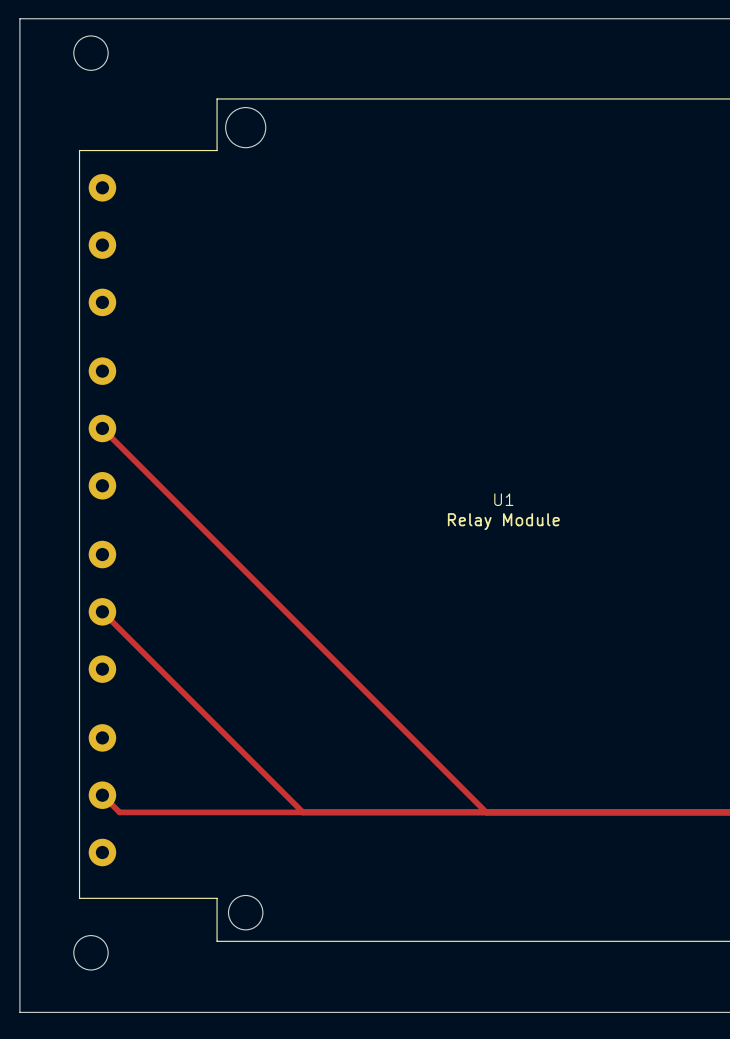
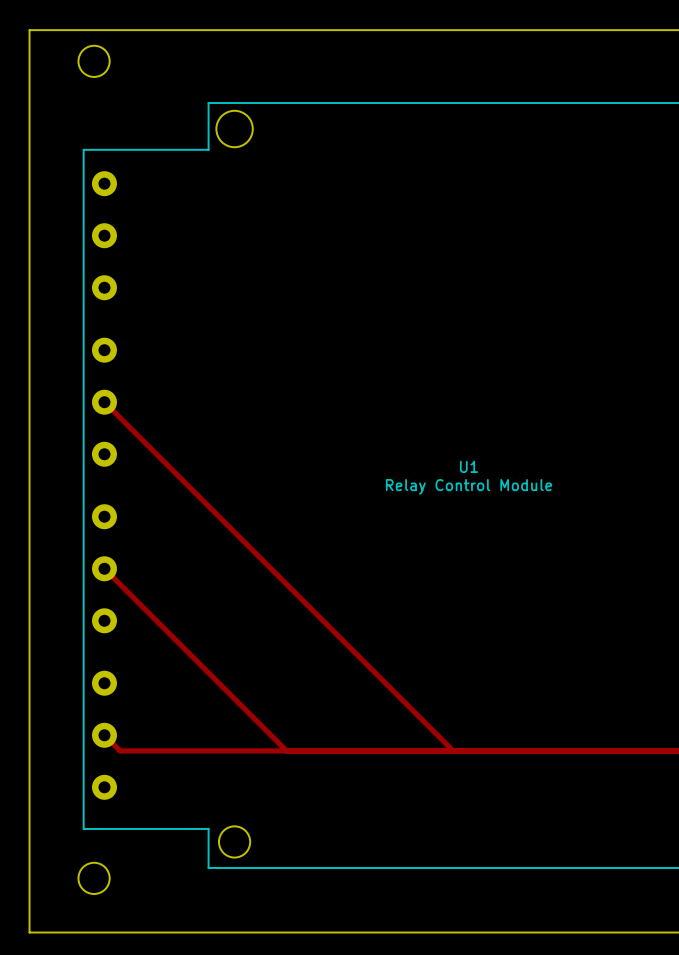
U1 value: Relay Module (503, 521) -> Relay Control Module (469, 486)

